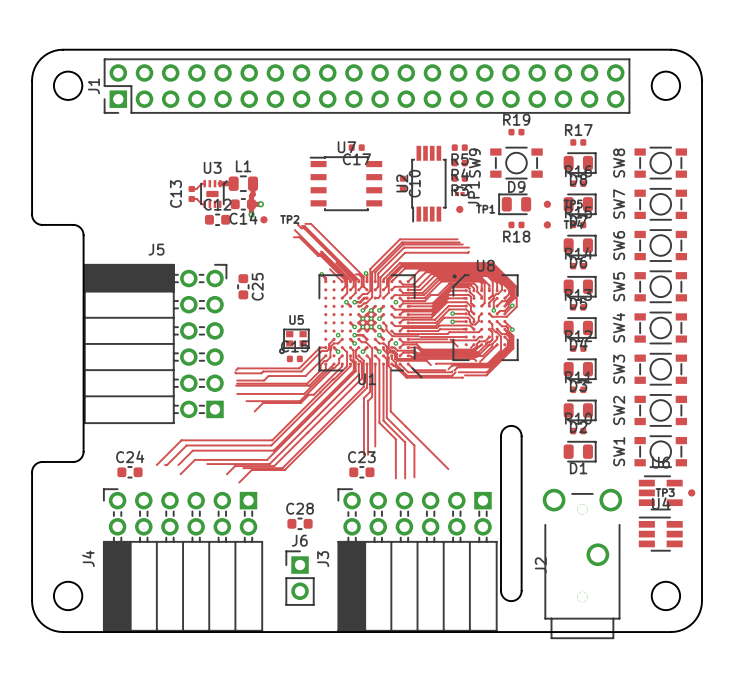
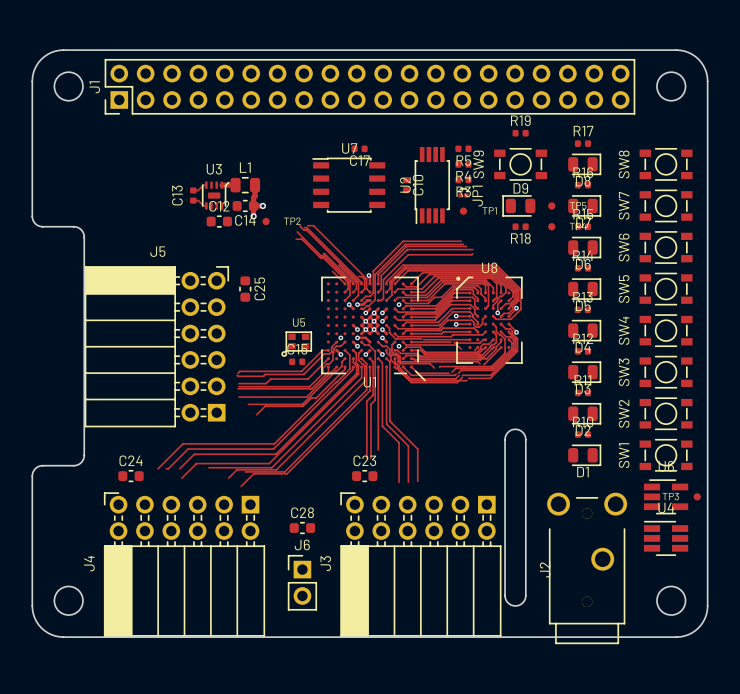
track: (321, 274) (325, 278) (325, 281) -> none
via: (321, 274) -> none
track: (388, 357) (388, 366) (390, 368) (390, 411) (448, 469) -> (391, 360) (411, 382) (457, 382) (462, 377)

